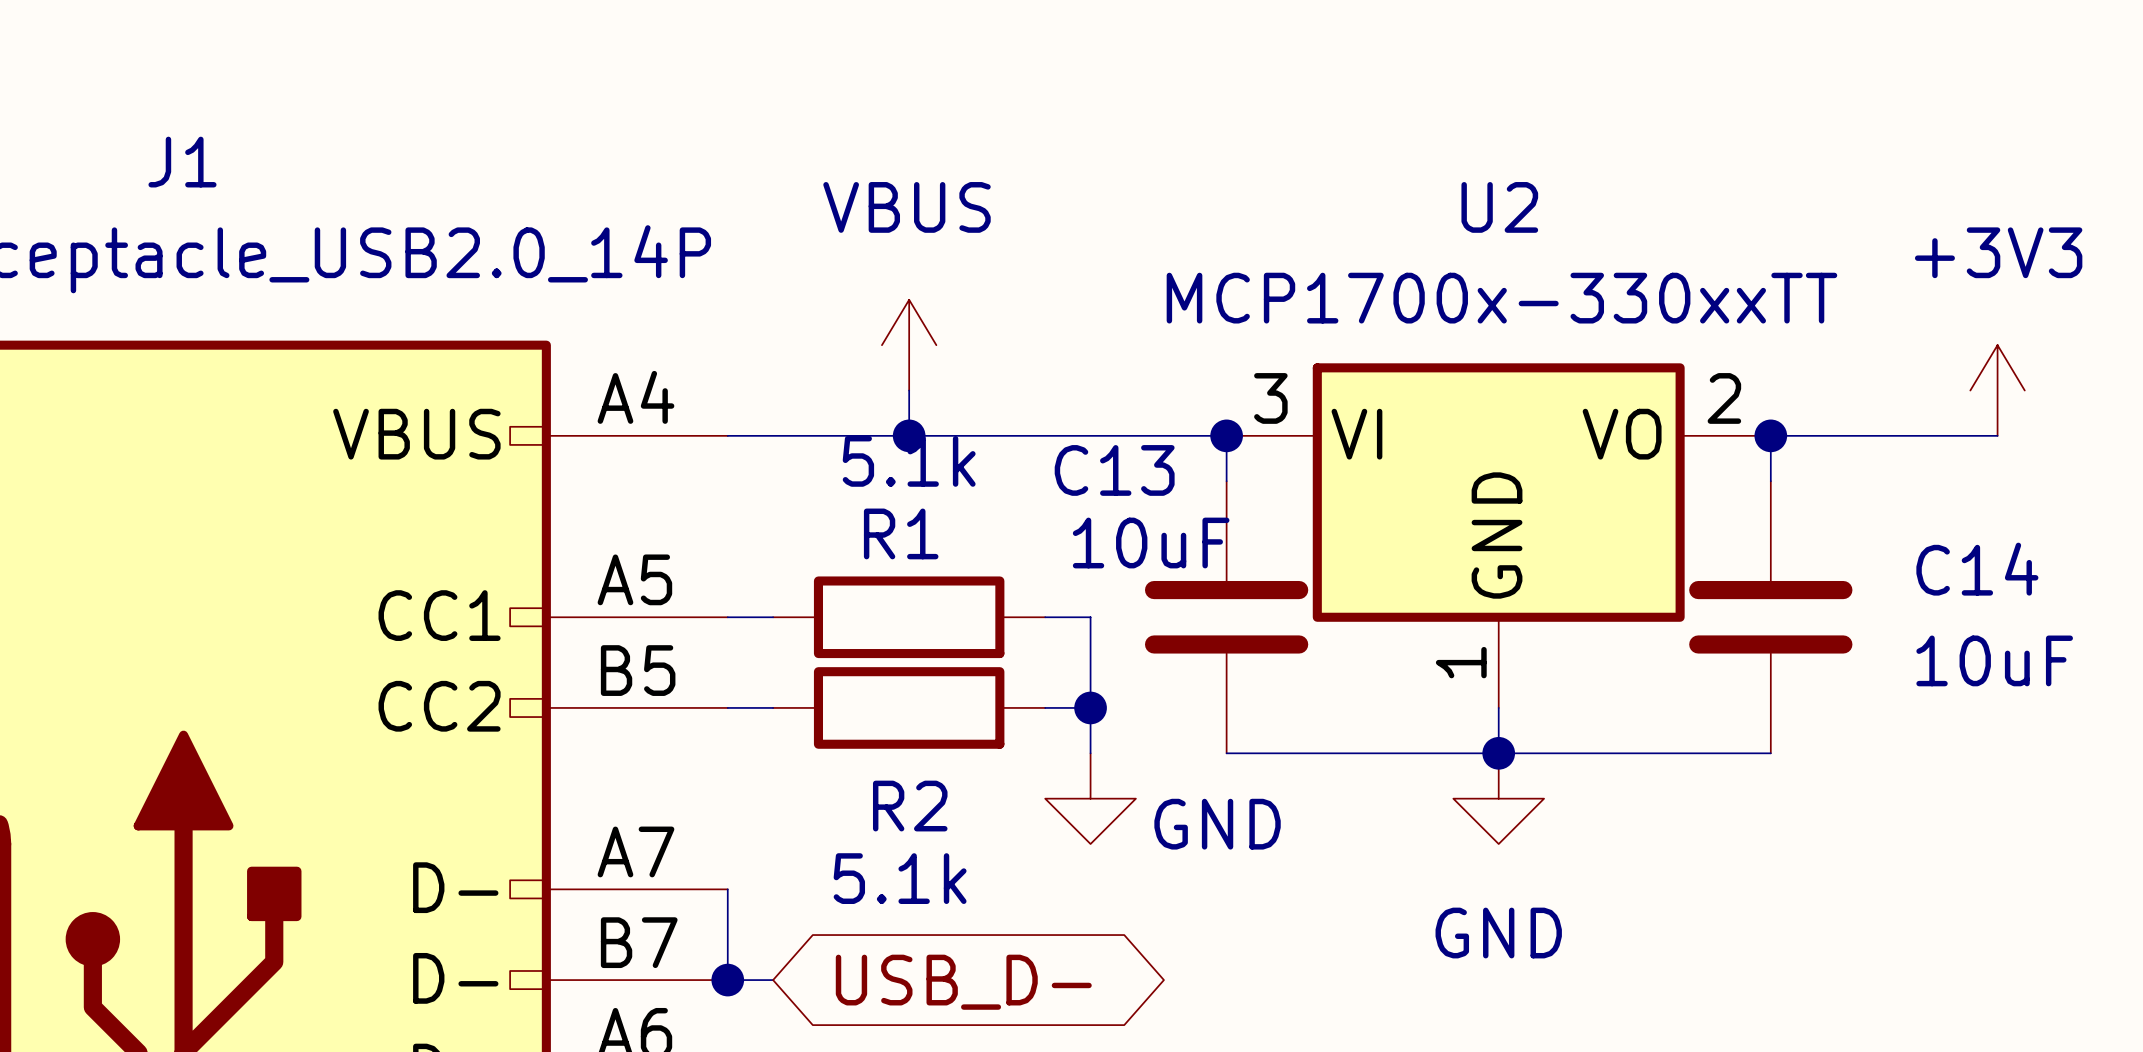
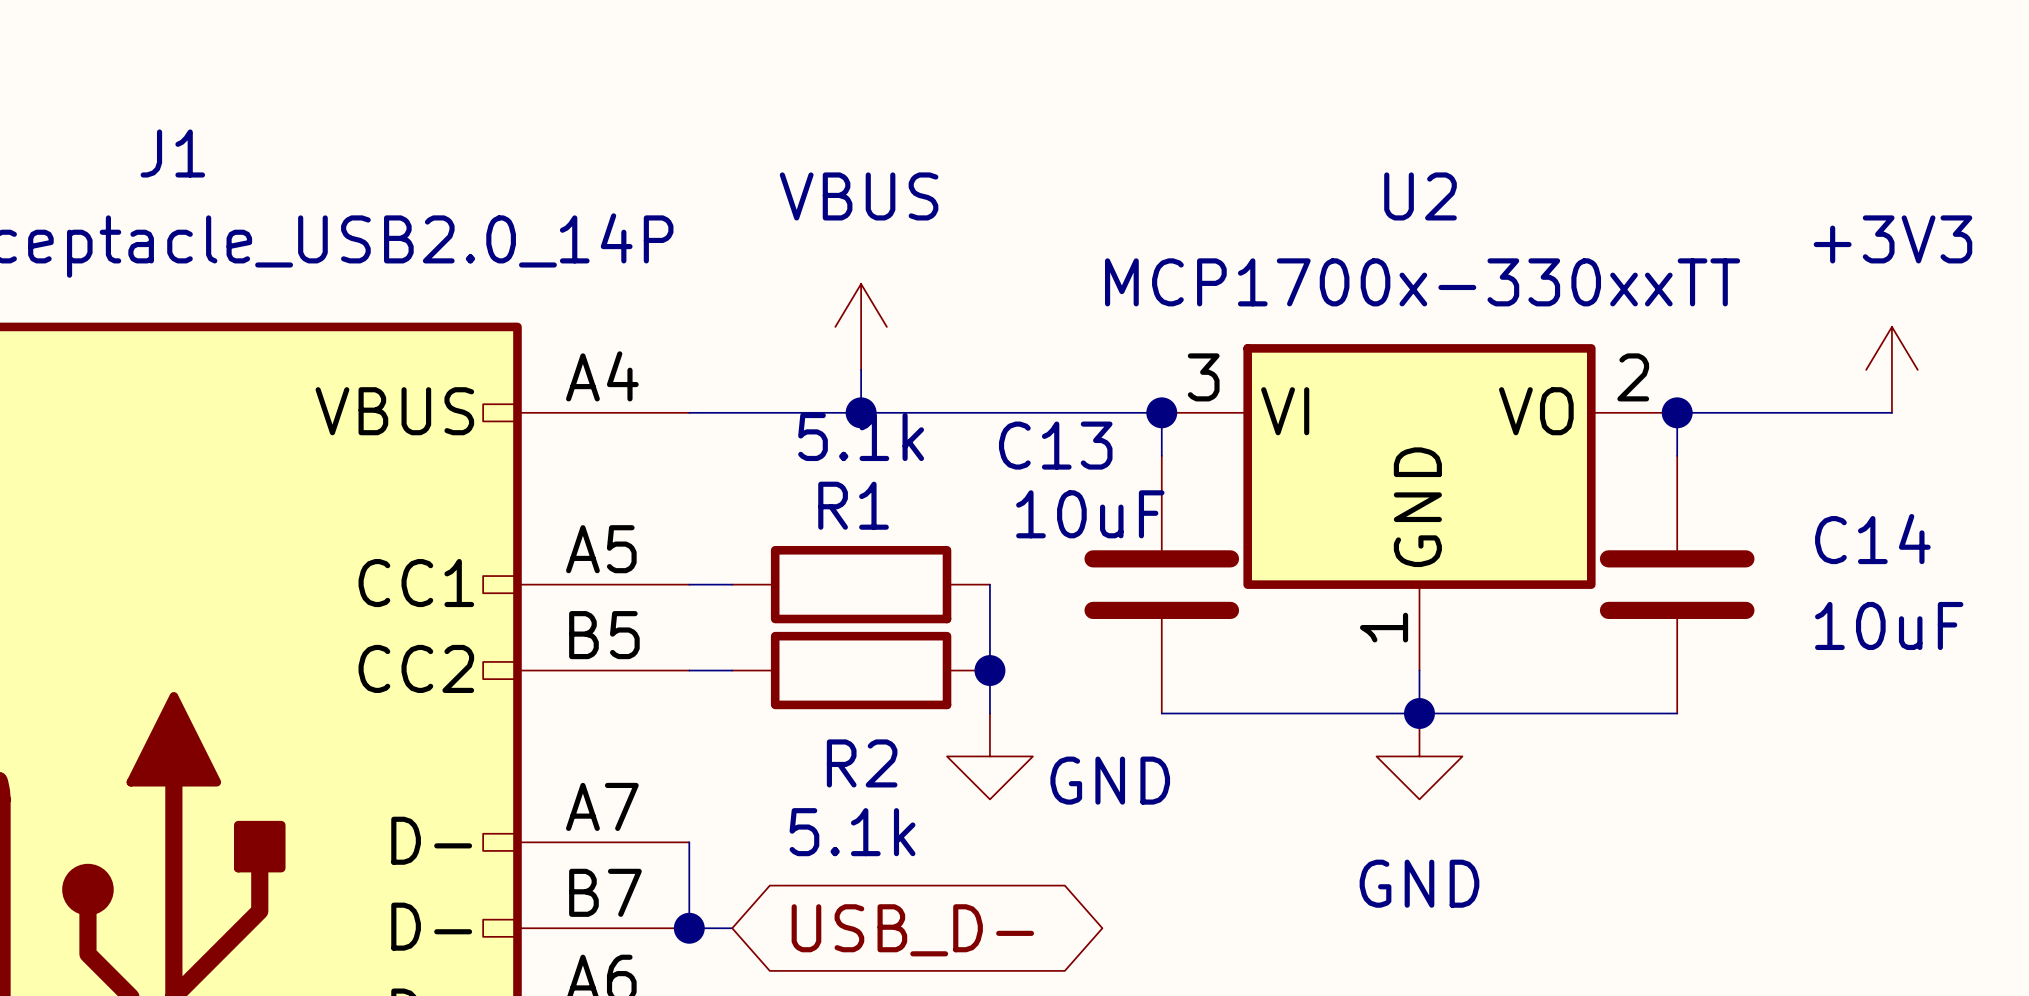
wire: (1045, 617) (1090, 617) (1090, 753) -> (989, 584) (989, 713)
wire: (1045, 707) (1090, 707) -> none
junction position: (1090, 707) -> (989, 670)
power symbol position: GND (1090, 798) -> GND (989, 756)

